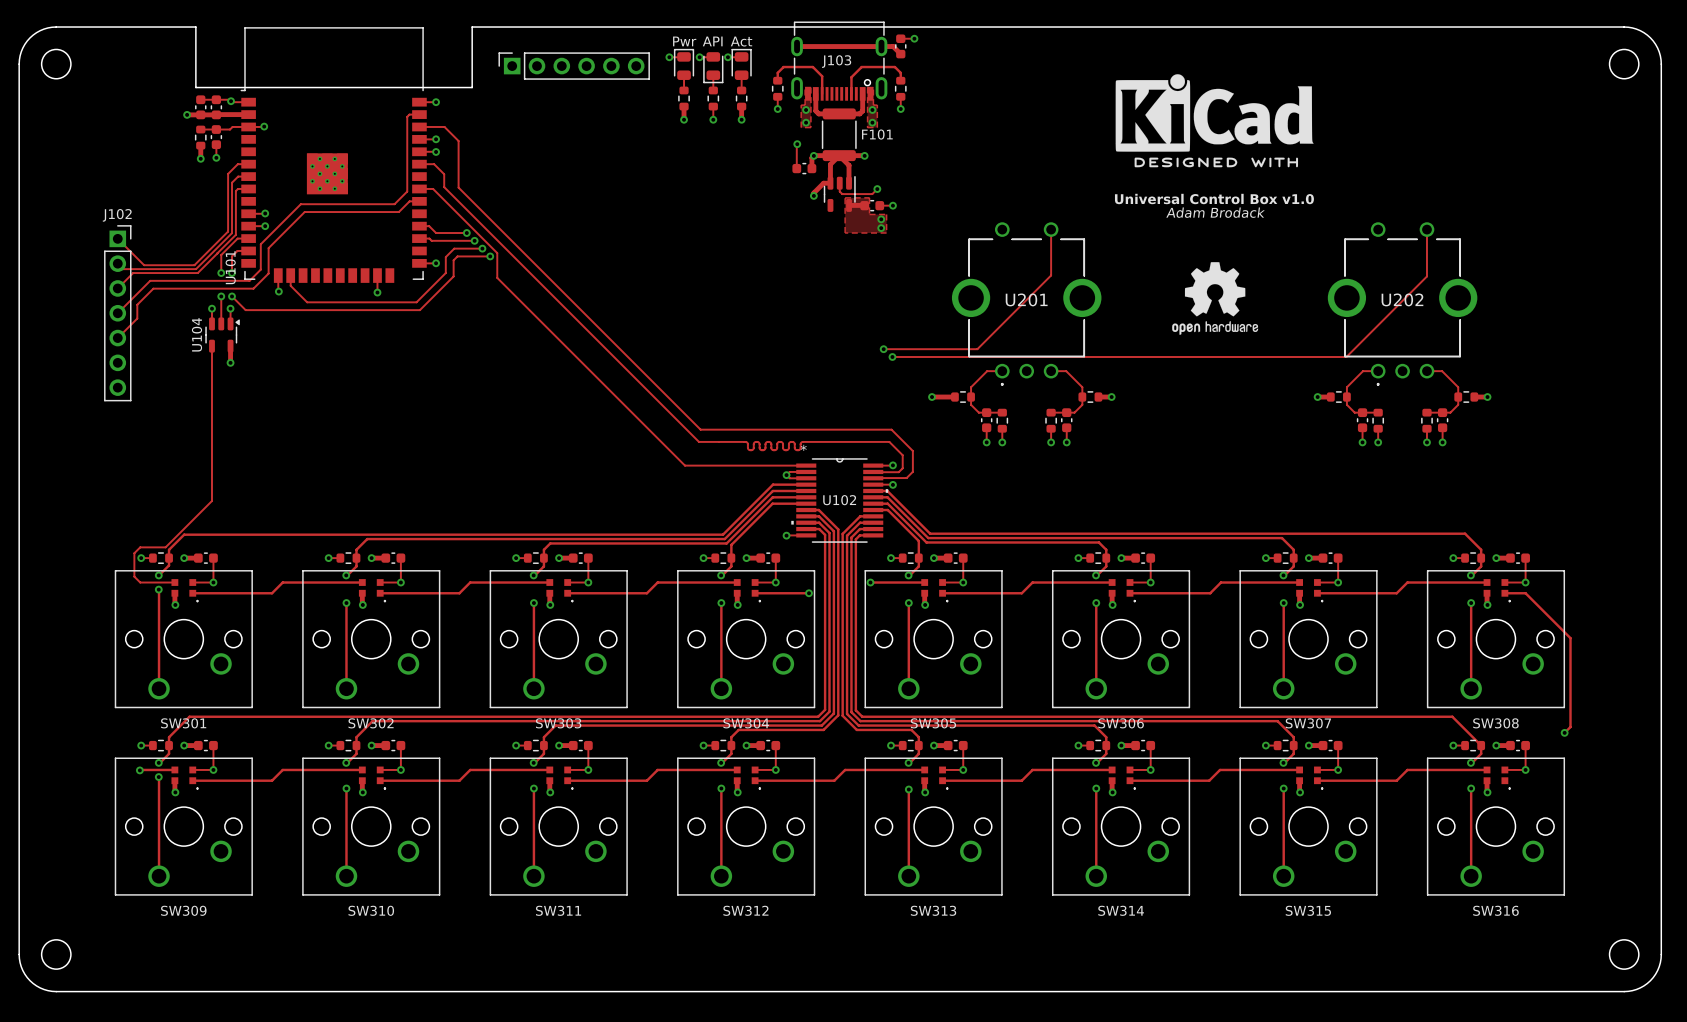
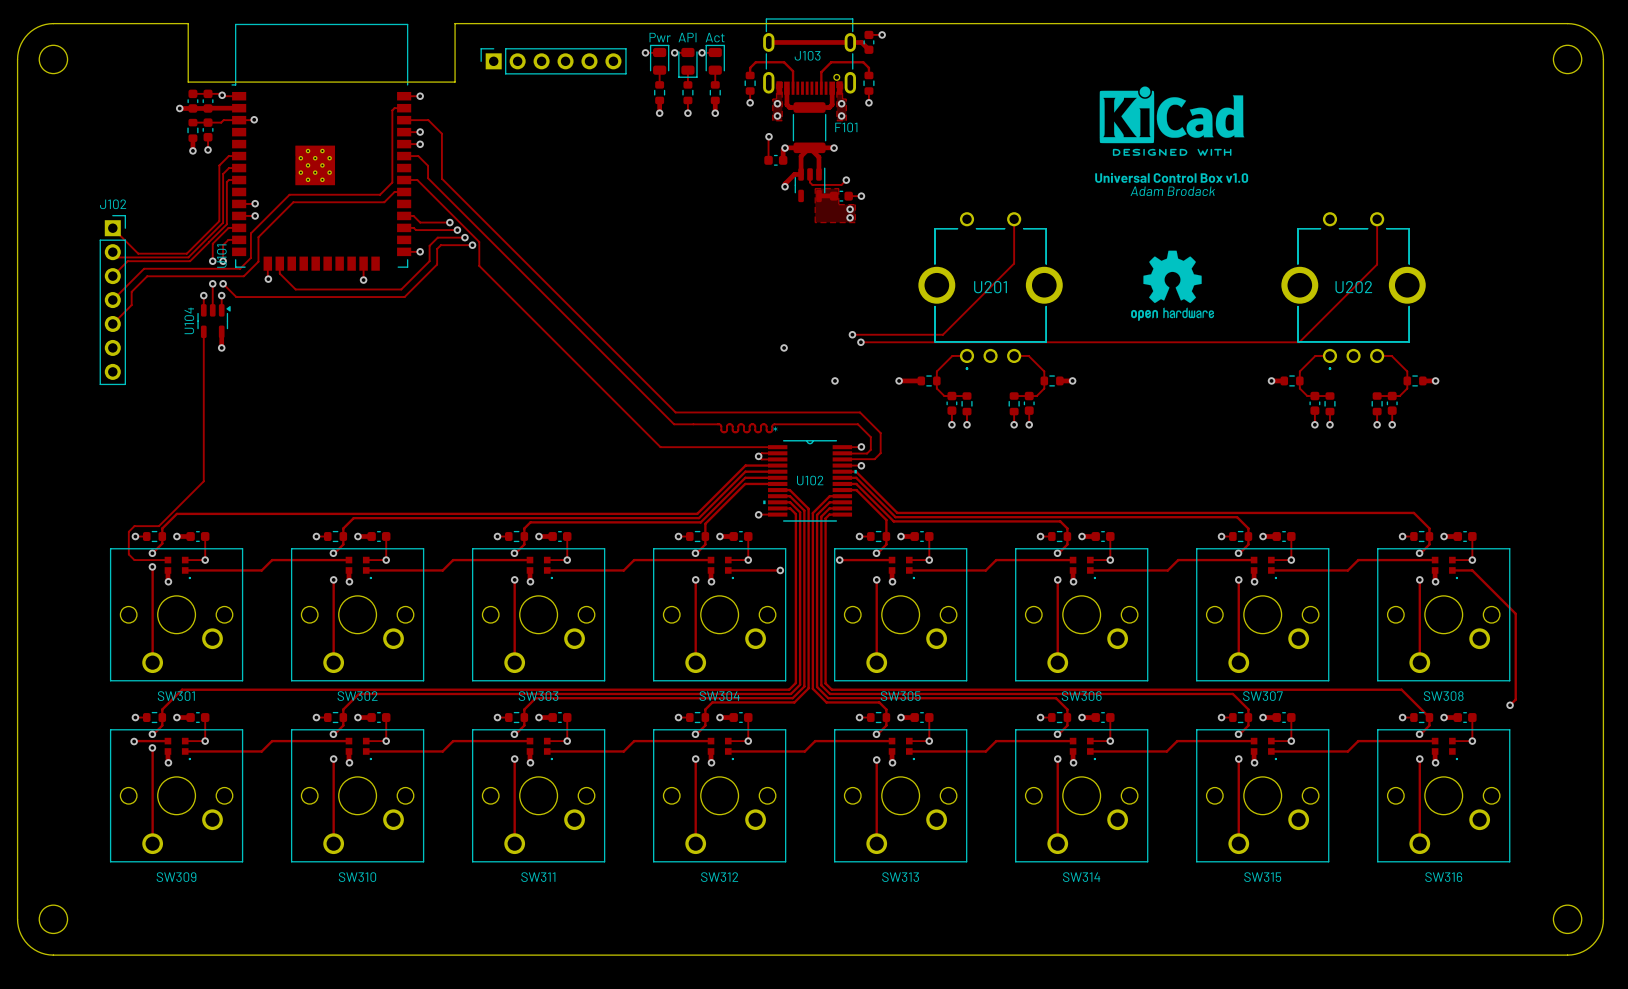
drawing shape: [1115, 74, 1314, 168] -> [1099, 86, 1245, 156]
text: none -> Universal Control Box v1.0 (1171, 177)
text: Universal Control Box v1.0 (1214, 198) -> Adam Brodack (1172, 191)
text: Adam Brodack (1215, 212) -> none
via: none -> (784, 347)
via: none -> (835, 380)

